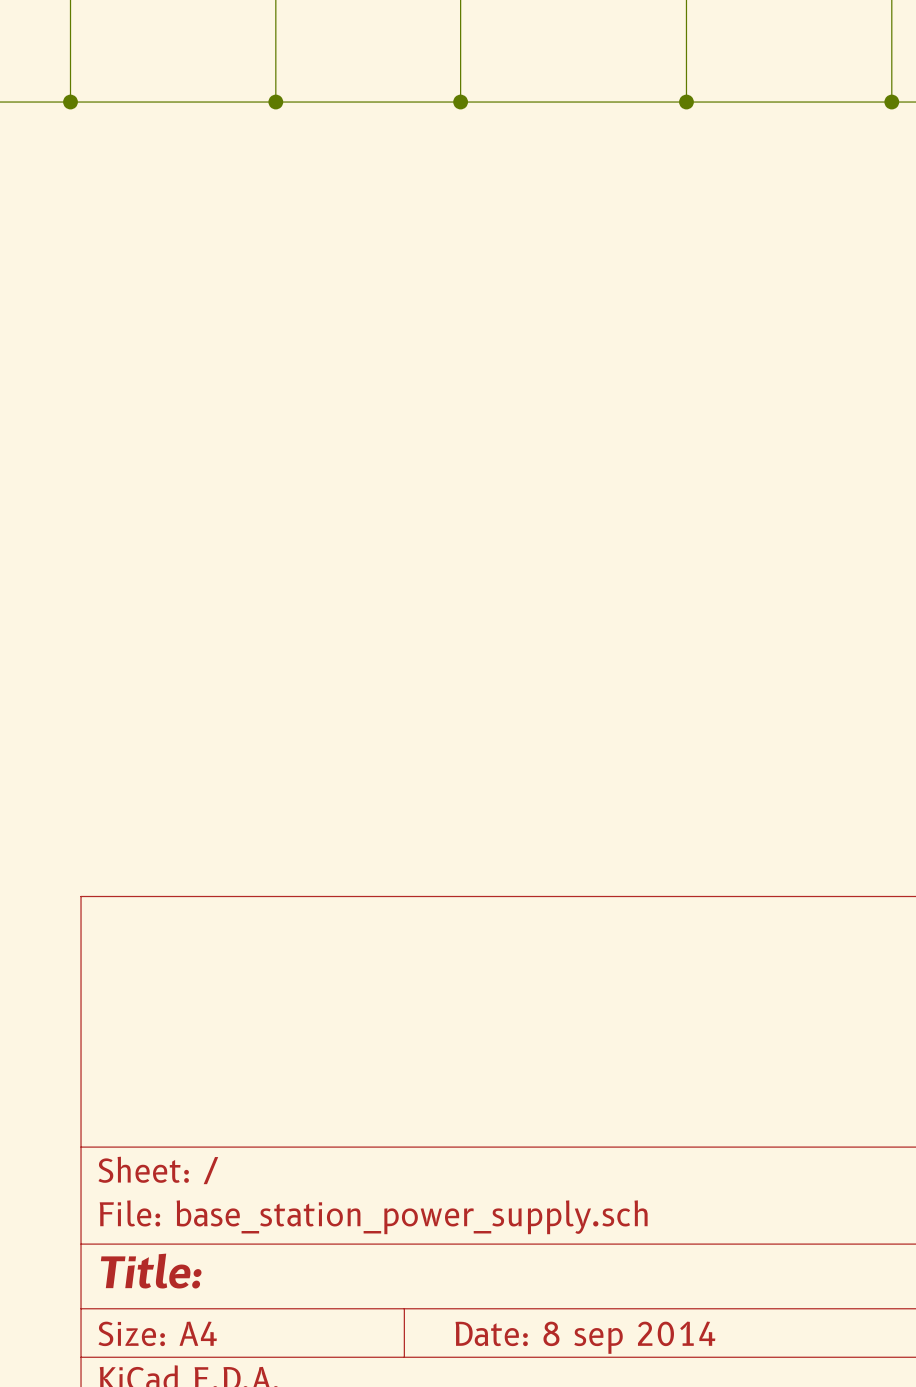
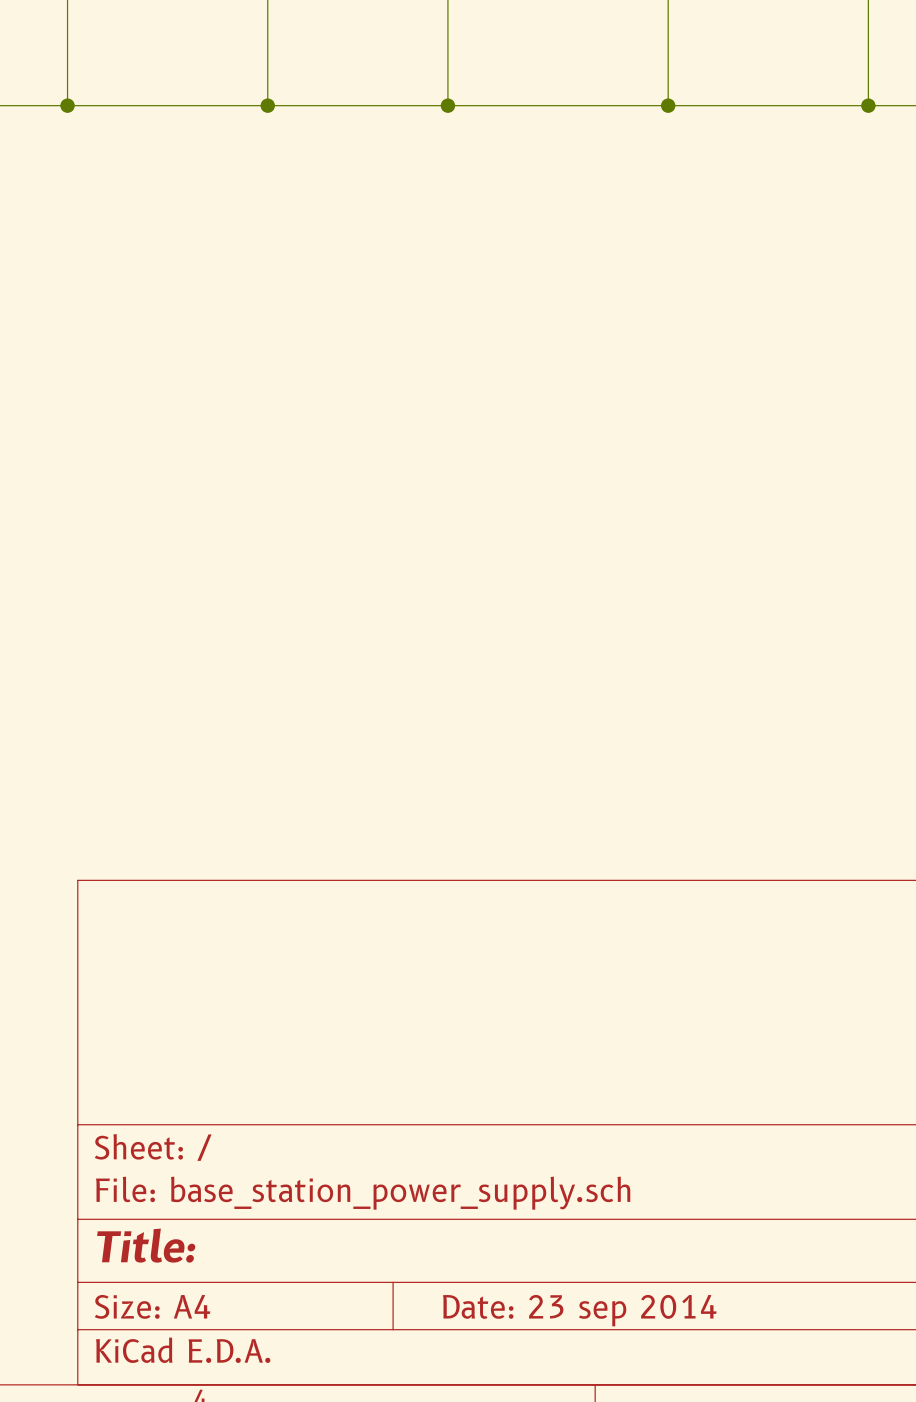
title block: Date: 8 sep 2014 (585, 1337) -> Date: 23 sep 2014 (579, 1310)

